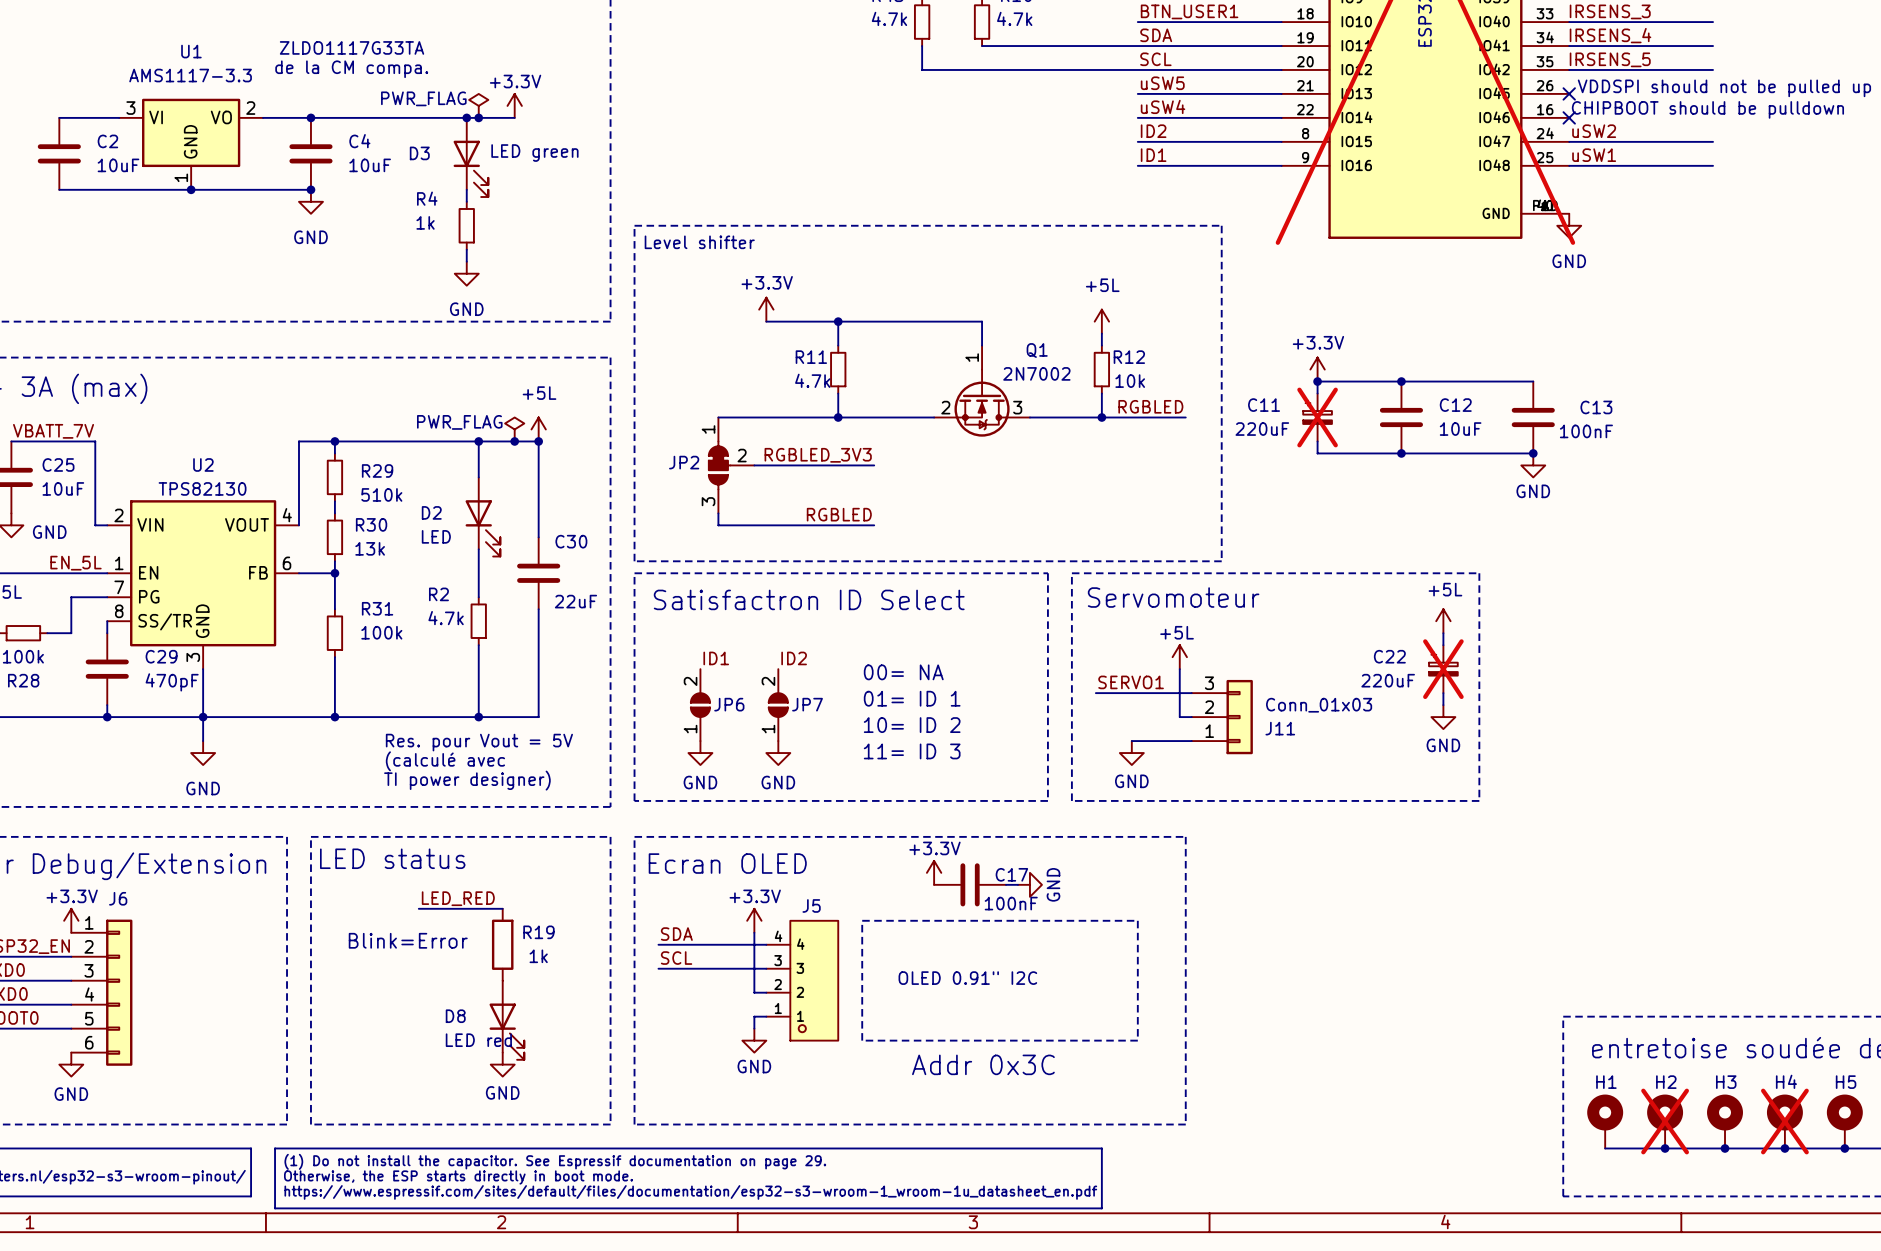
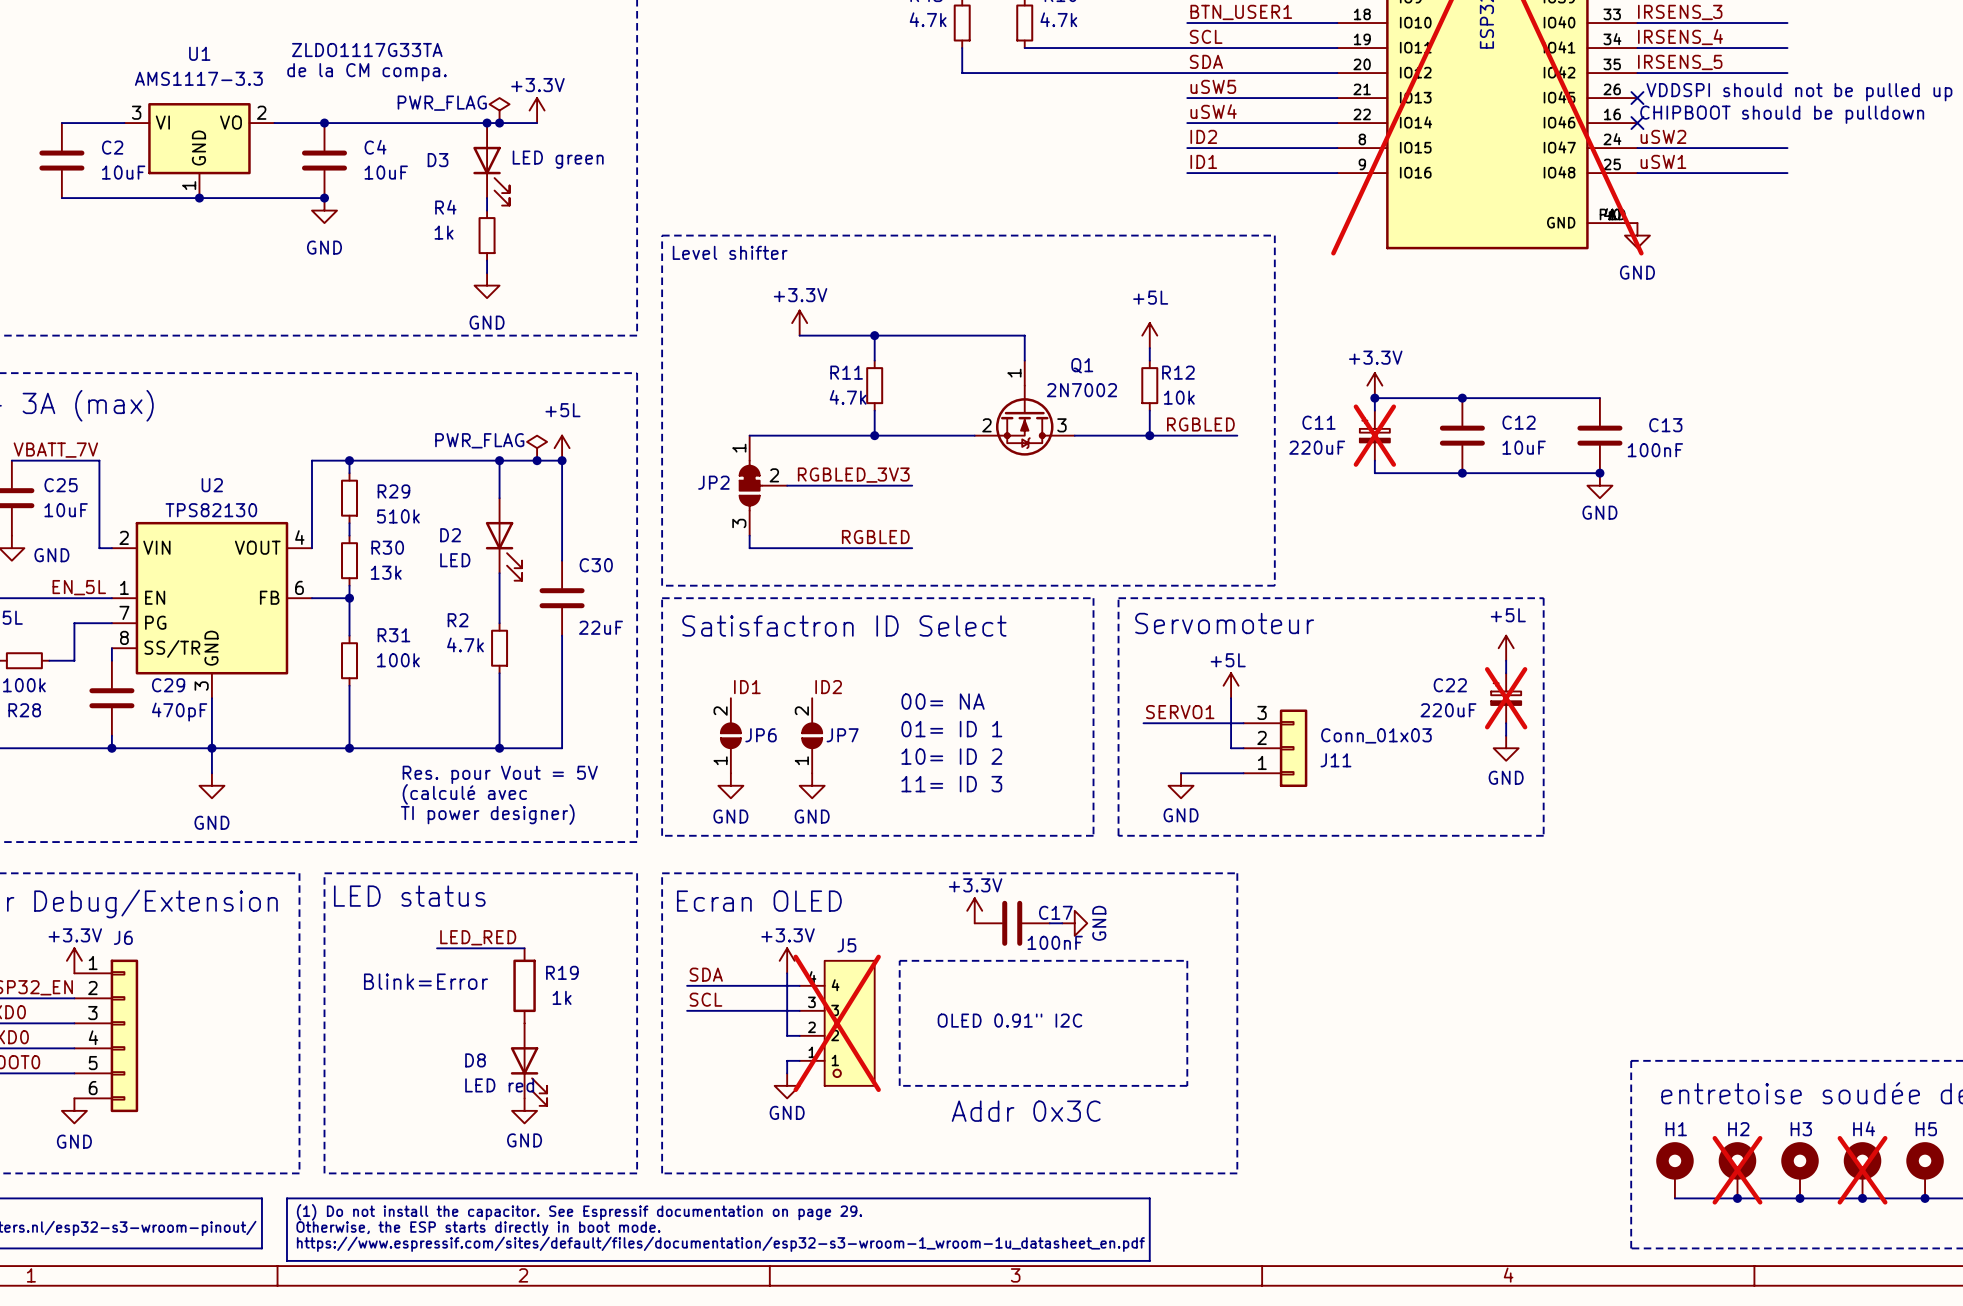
label: SDA (1156, 35) -> SCL (1206, 36)
label: SCL (1155, 59) -> SDA (1206, 61)
J5 do-not-place cross: none -> (837, 1023)

